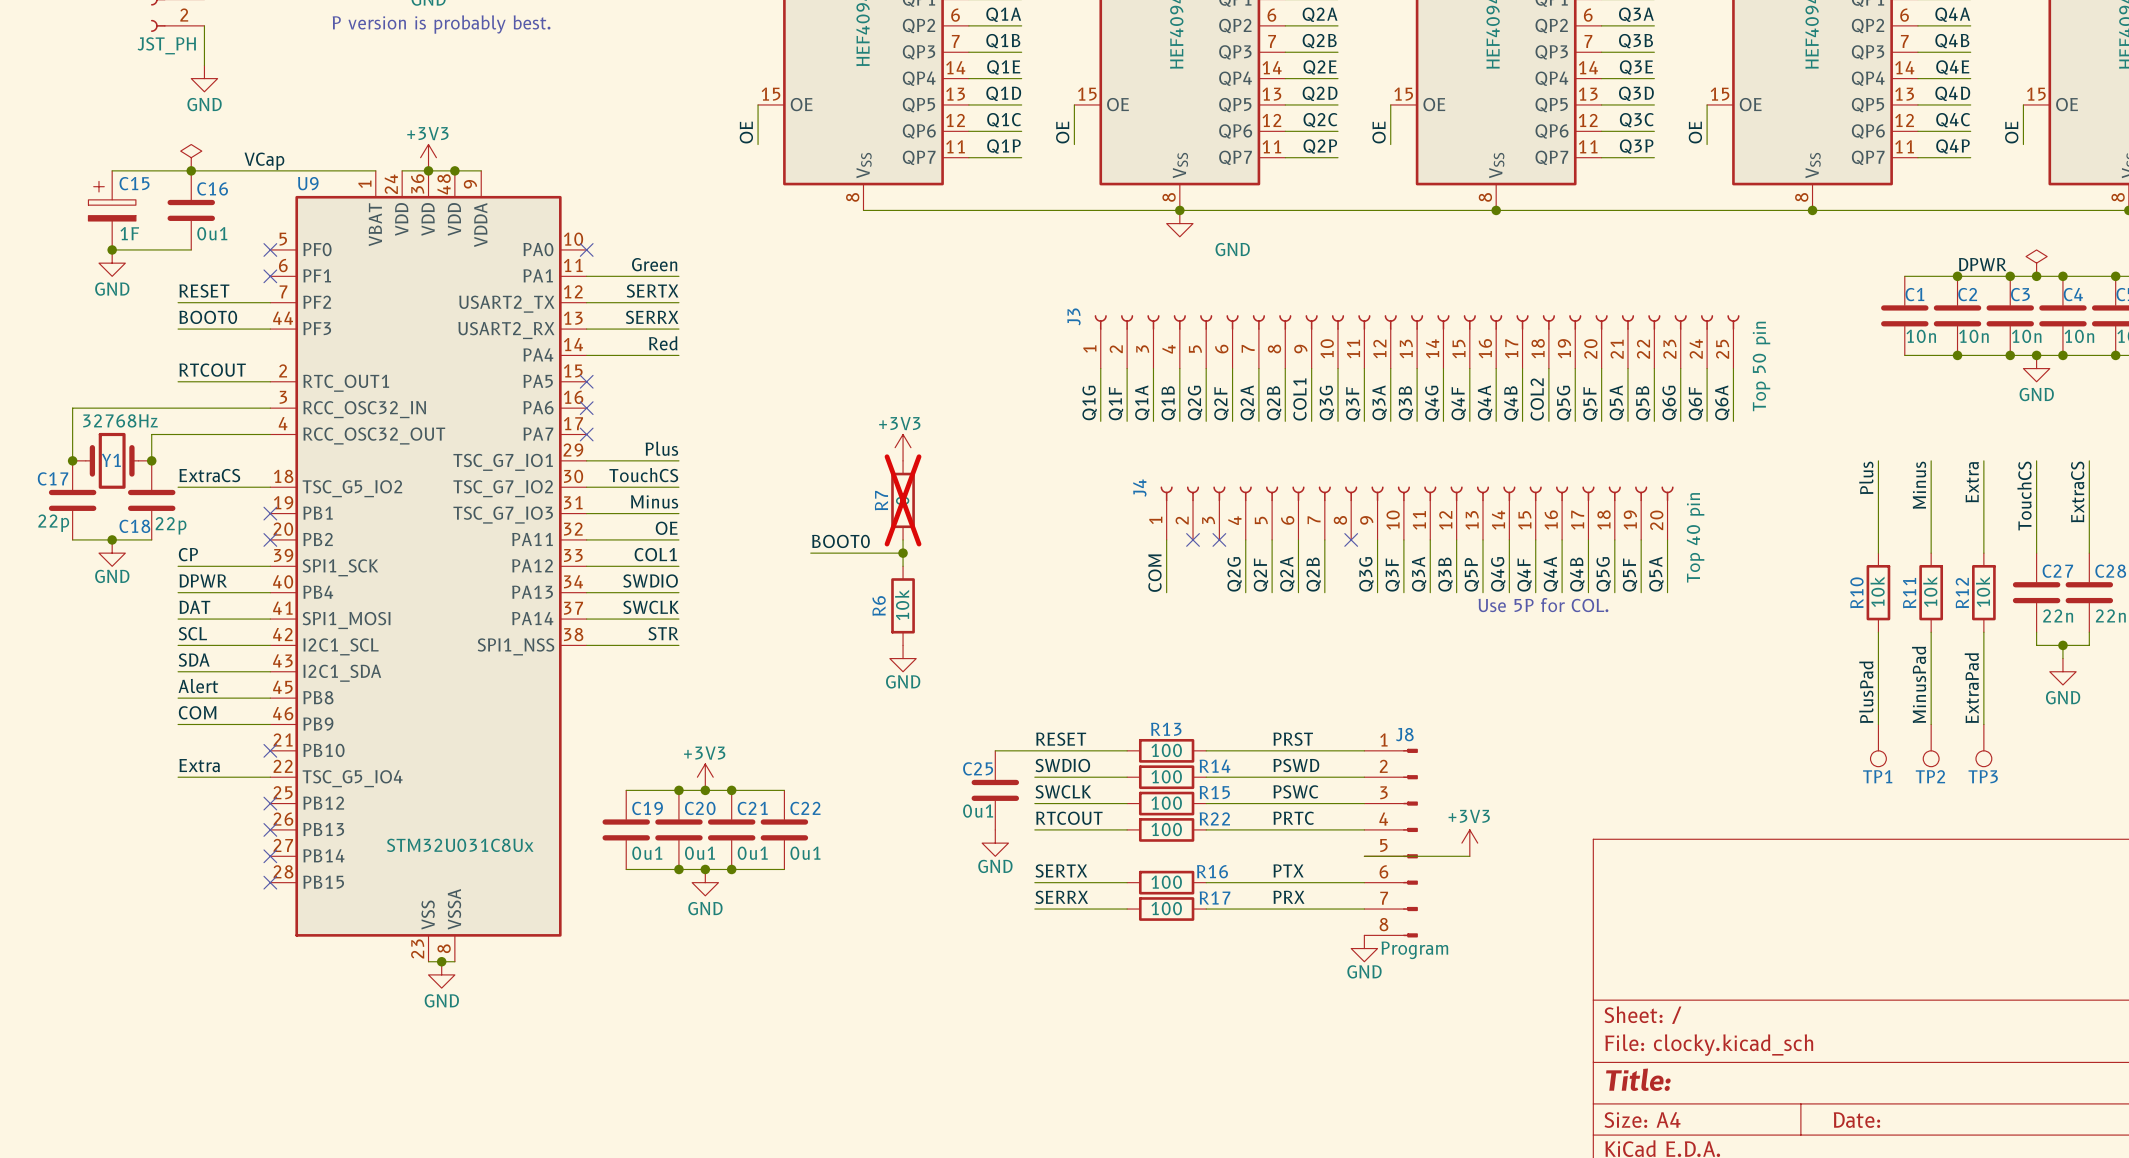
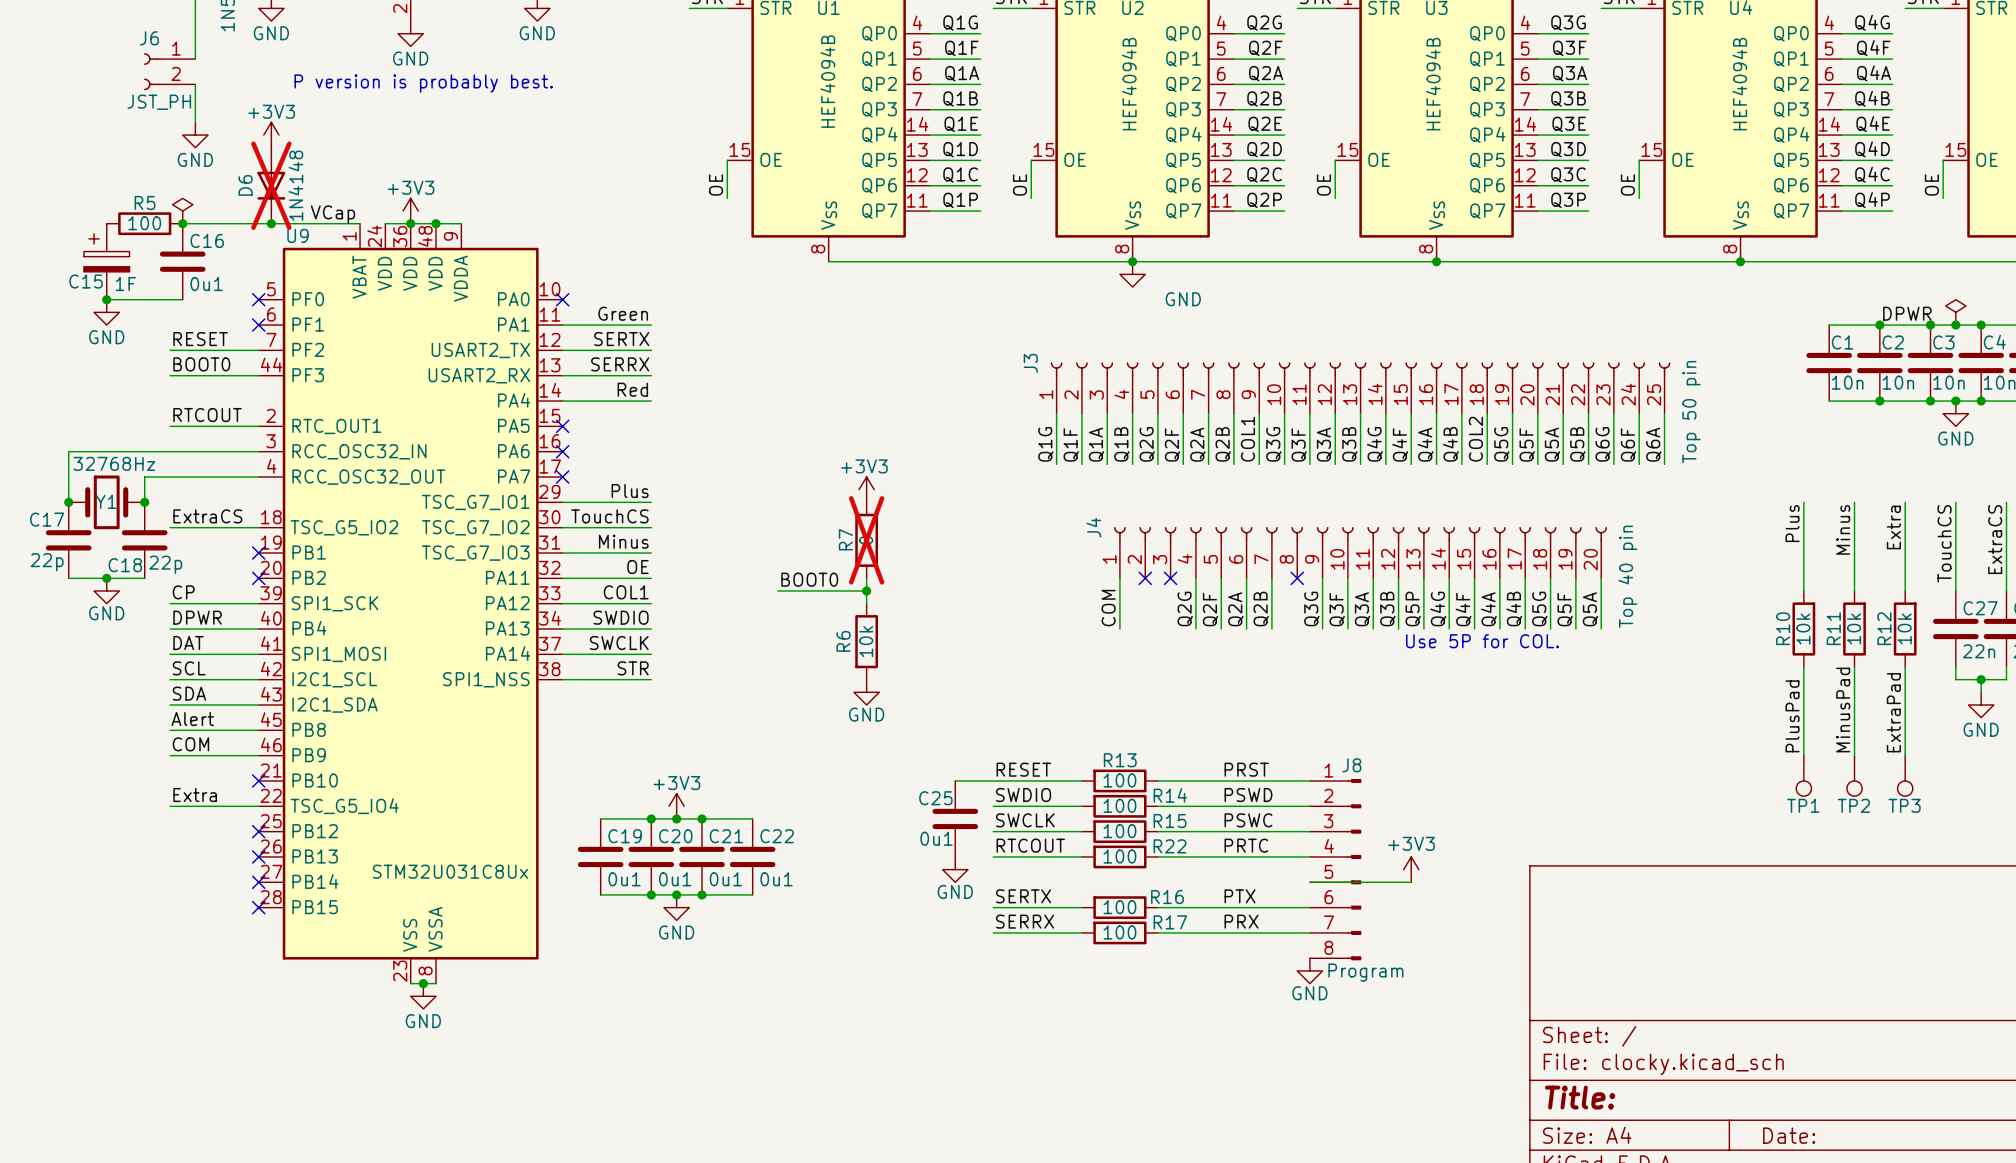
power symbol: none -> +3V3 (271, 135)
D6: none -> 1N4148 (271, 185)
label position: VCap (264, 161) -> VCap (332, 214)
wire: (112, 170) (191, 170) -> none
R5: none -> 100 (144, 223)
junction: none -> (271, 223)
C15 name position: C15 (134, 183) -> C15 (86, 281)

